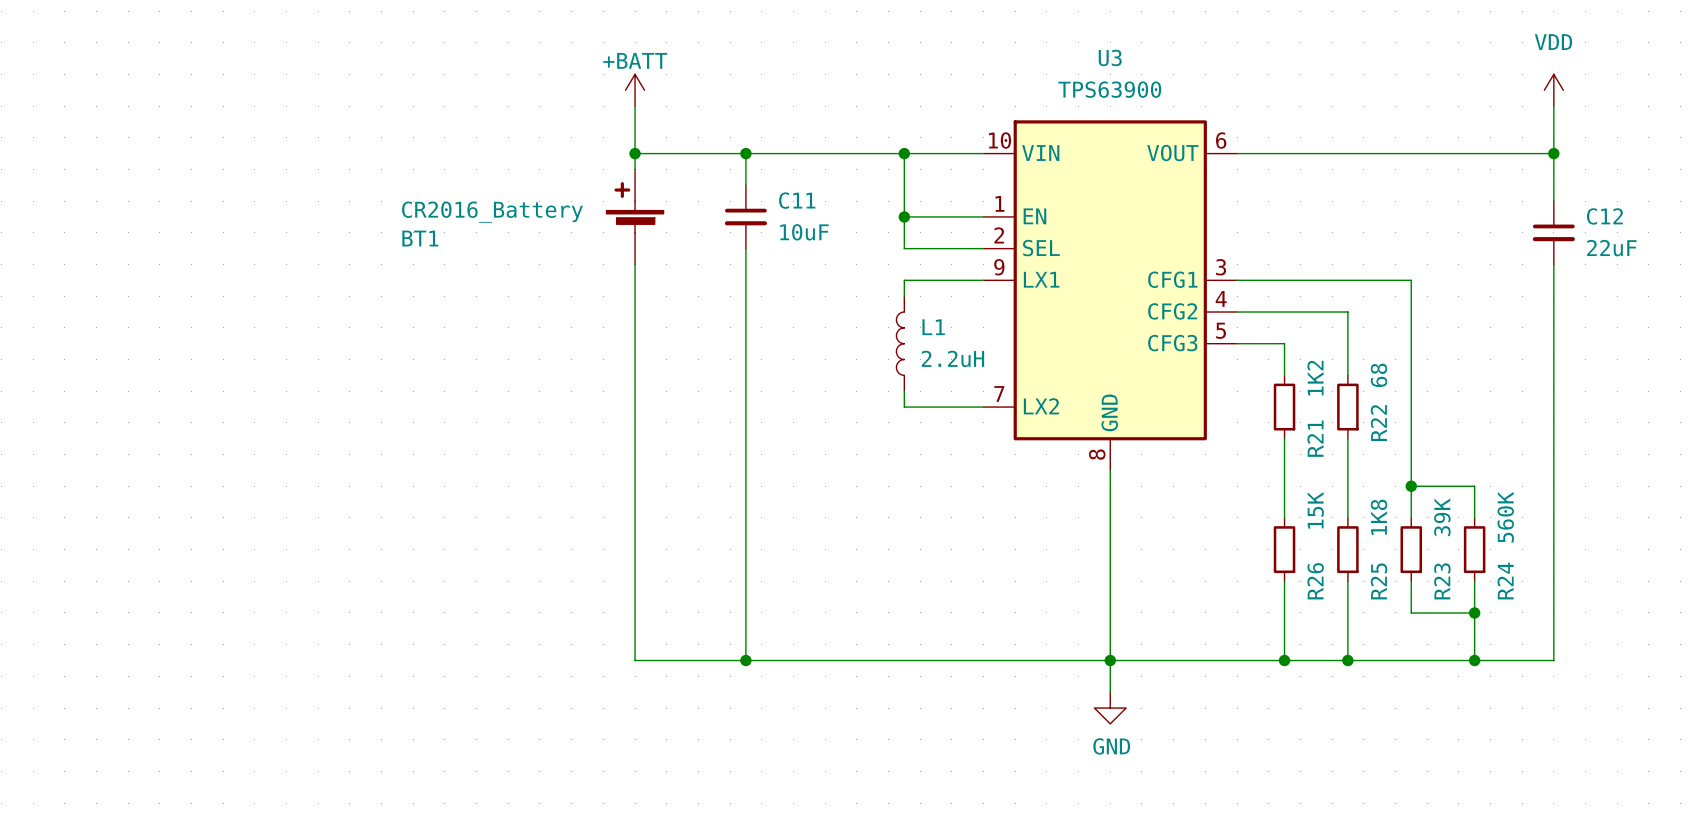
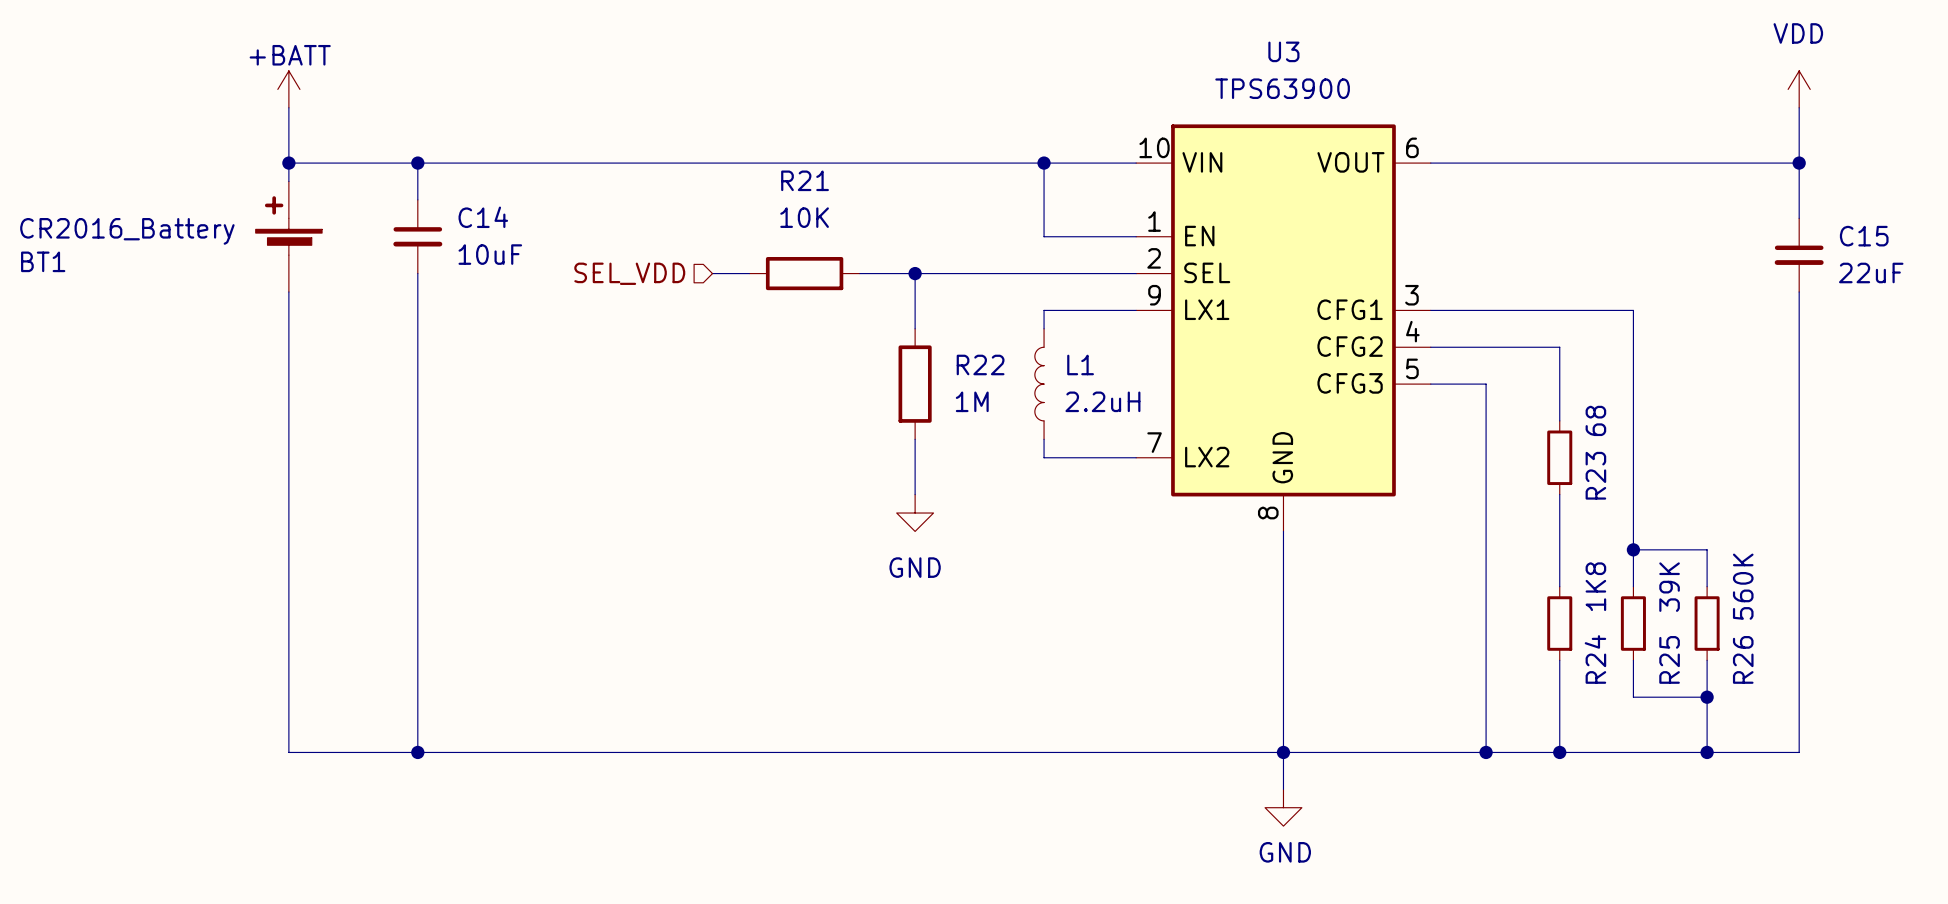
power symbol: none -> +BATT (288, 89)
power symbol: +BATT (635, 90) -> none
wire: none -> (288, 107) (288, 181)
wire: (635, 106) (635, 169) -> none
wire: none -> (288, 163) (730, 163)
junction: none -> (288, 163)
wire: none -> (417, 163) (417, 199)
junction: none -> (417, 163)
junction: (635, 153) -> none
wire: (745, 153) (745, 185) -> none
junction: (745, 153) -> none
C14: none -> 10uF (417, 236)
BT1 position: (635, 216) -> (288, 236)
C11: 10uF (745, 216) -> none
wire: (904, 216) (904, 248) -> (859, 273) (1044, 273)
junction: (904, 216) -> none
C12 name: C12 (1604, 216) -> C15 (1864, 236)
wire: none -> (417, 273) (417, 752)
wire: none -> (712, 273) (749, 273)
wire: (745, 248) (745, 660) -> none
wire: none -> (915, 273) (915, 328)
junction: none -> (915, 273)
hierarchical label: none -> SEL_VDD (629, 273)
wire: (635, 264) (635, 660) -> (288, 292) (288, 752) (730, 752)
R22: none -> 1M (915, 384)
R21 symbol: [1273, 375, 1296, 439] -> [749, 257, 860, 291]
wire: none -> (1486, 420) (1486, 494)
R21 value: 1K2 (1315, 378) -> 10K (804, 217)
wire: none -> (915, 439) (915, 494)
R22 name: R22 (1378, 423) -> R23 (1595, 475)
R21 name position: R21 (1315, 438) -> R21 (805, 180)
power symbol: none -> GND (915, 513)
wire: none -> (1486, 586) (1486, 660)
R26: 15K (1284, 549) -> none
R25 name: R25 (1379, 581) -> R24 (1595, 659)
R23 name: R23 (1442, 581) -> R25 (1669, 659)
R24 name: R24 (1505, 581) -> R26 (1743, 659)
junction: none -> (417, 752)
junction: (745, 660) -> none

